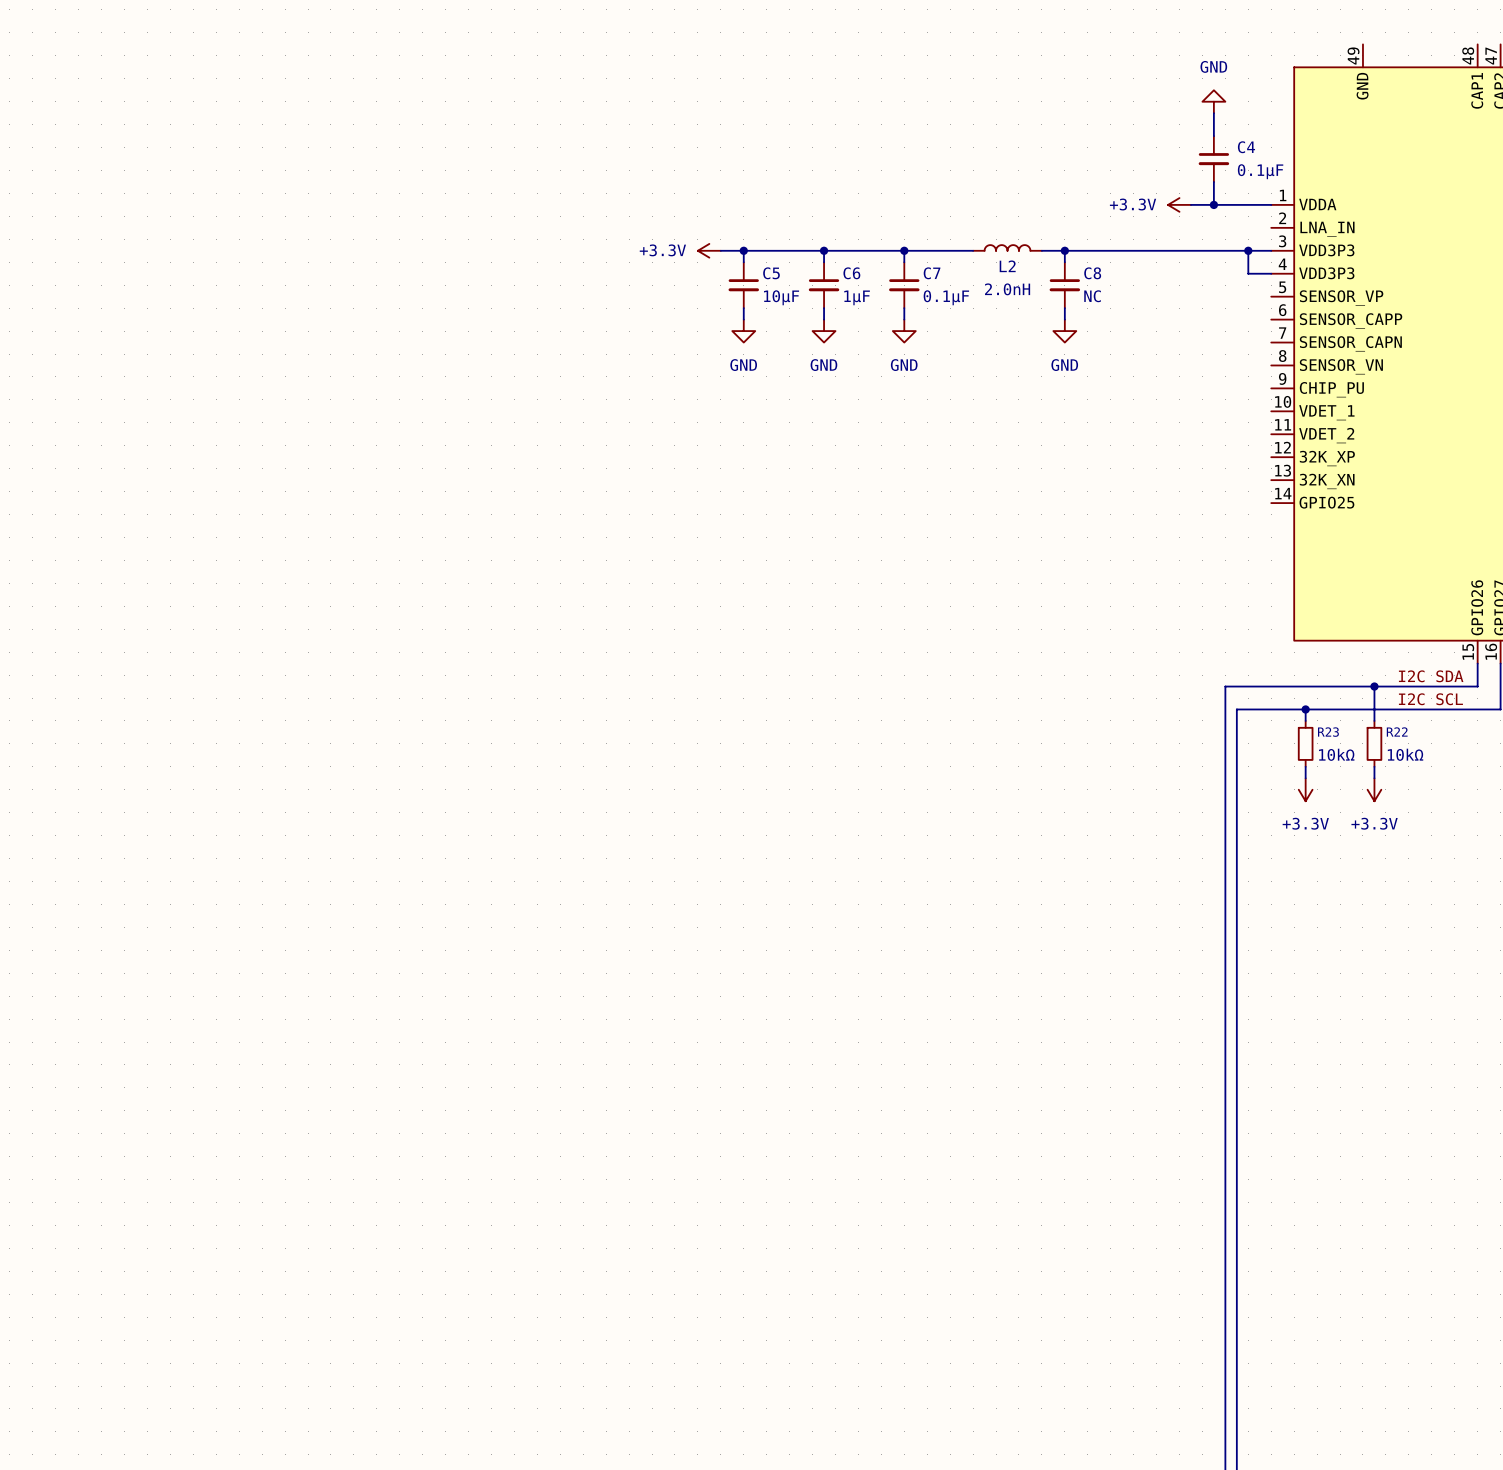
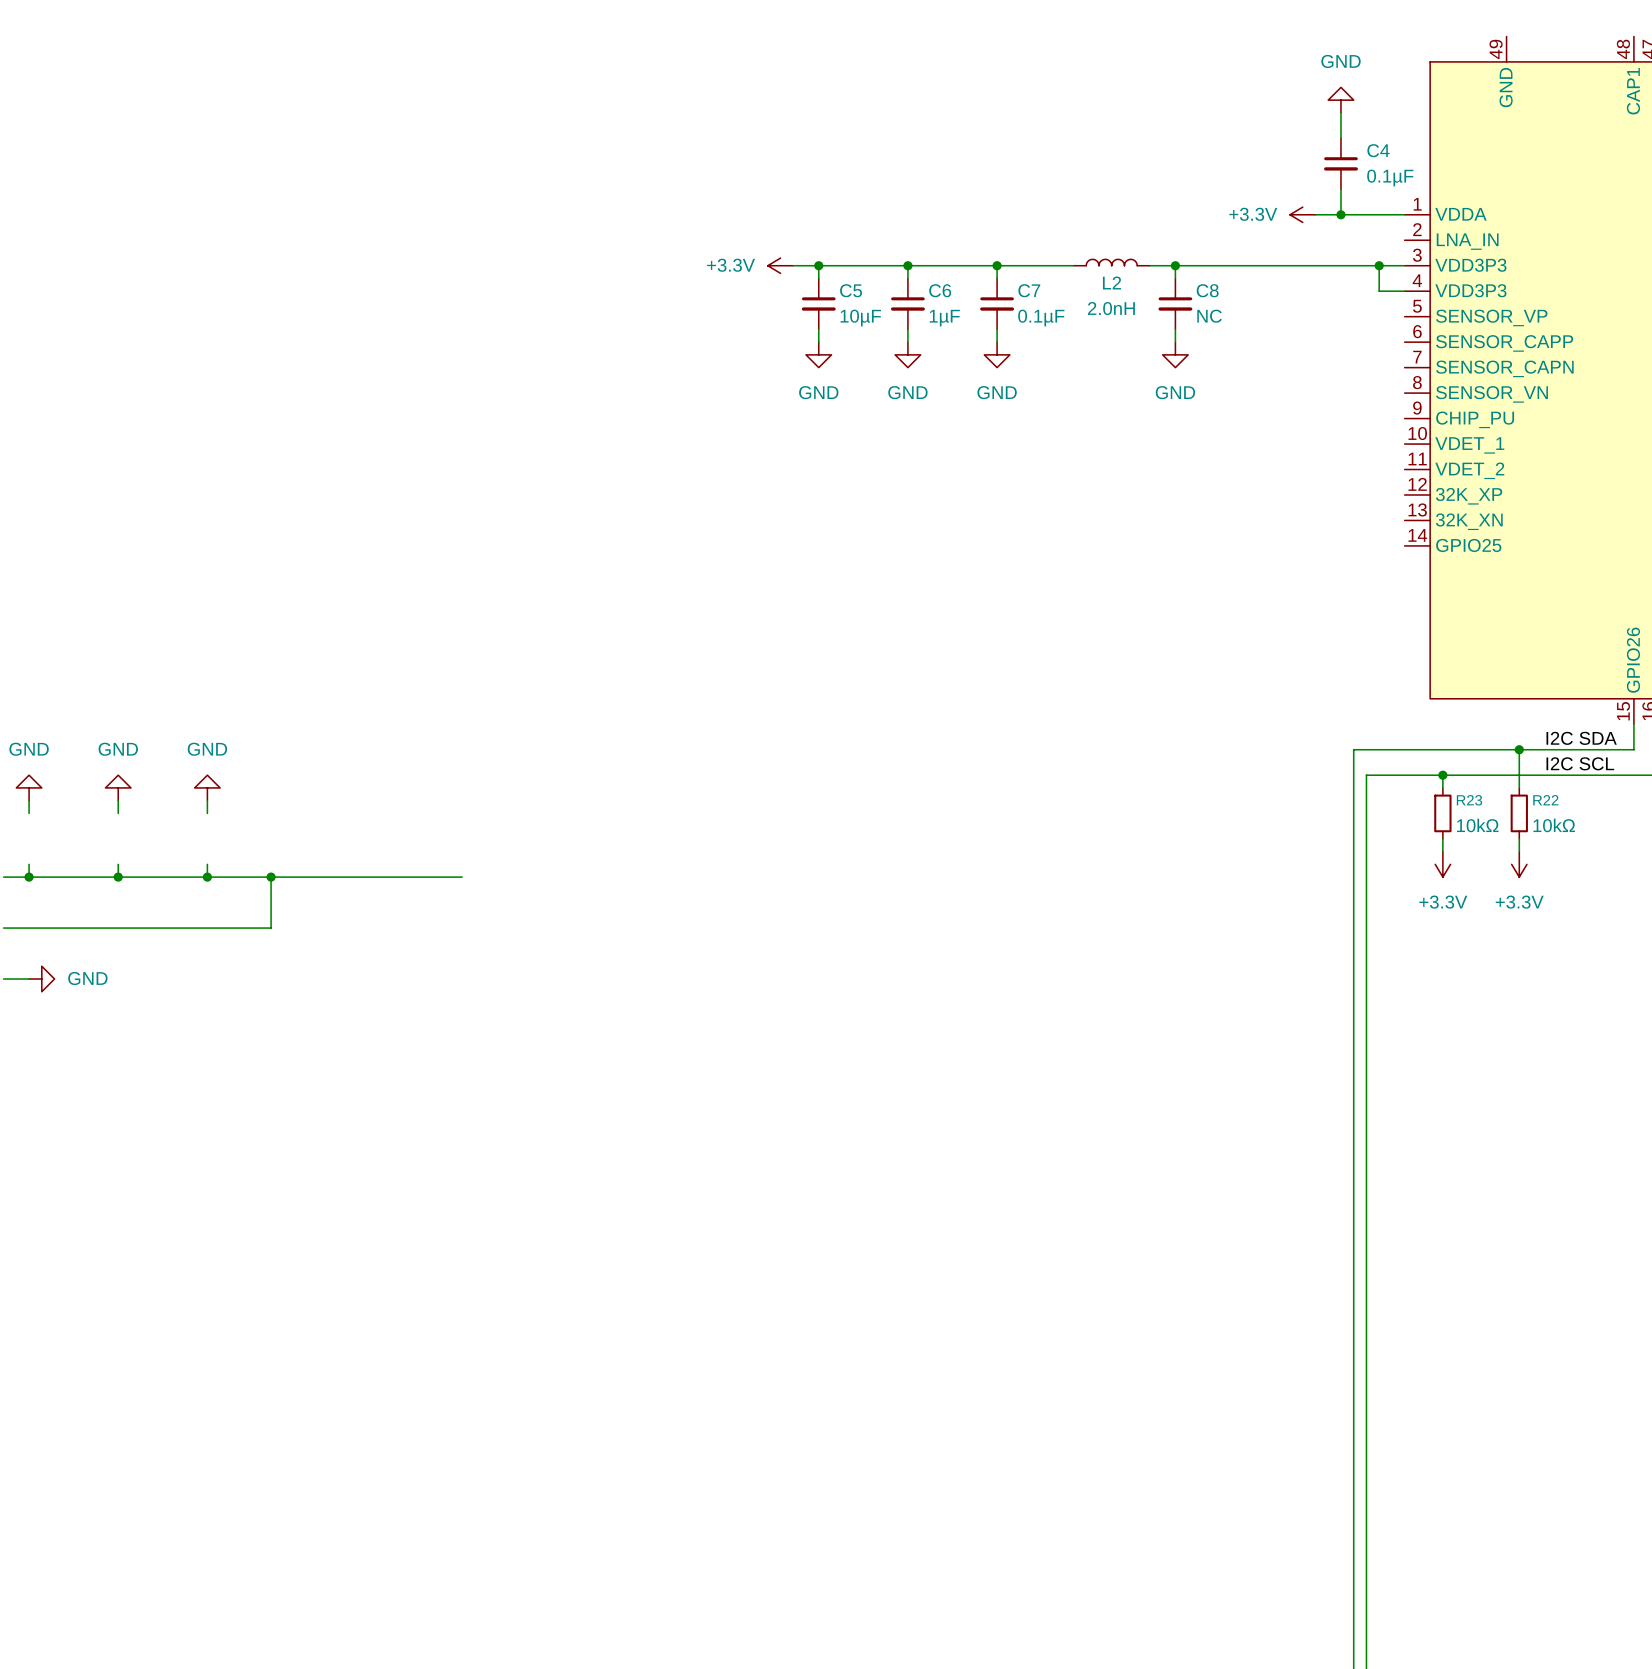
power symbol: none -> GND (29, 787)
power symbol: none -> GND (118, 787)
power symbol: none -> GND (207, 787)
wire: none -> (29, 800) (29, 813)
wire: none -> (118, 800) (118, 813)
wire: none -> (207, 800) (207, 813)
wire: none -> (29, 864) (29, 877)
wire: none -> (118, 864) (118, 877)
wire: none -> (207, 864) (207, 877)
wire: none -> (3, 877) (462, 877)
junction: none -> (29, 877)
junction: none -> (118, 877)
junction: none -> (207, 877)
wire: none -> (271, 877) (271, 928) (3, 928)
junction: none -> (271, 877)
wire: none -> (3, 979) (29, 979)
power symbol: none -> GND (41, 979)

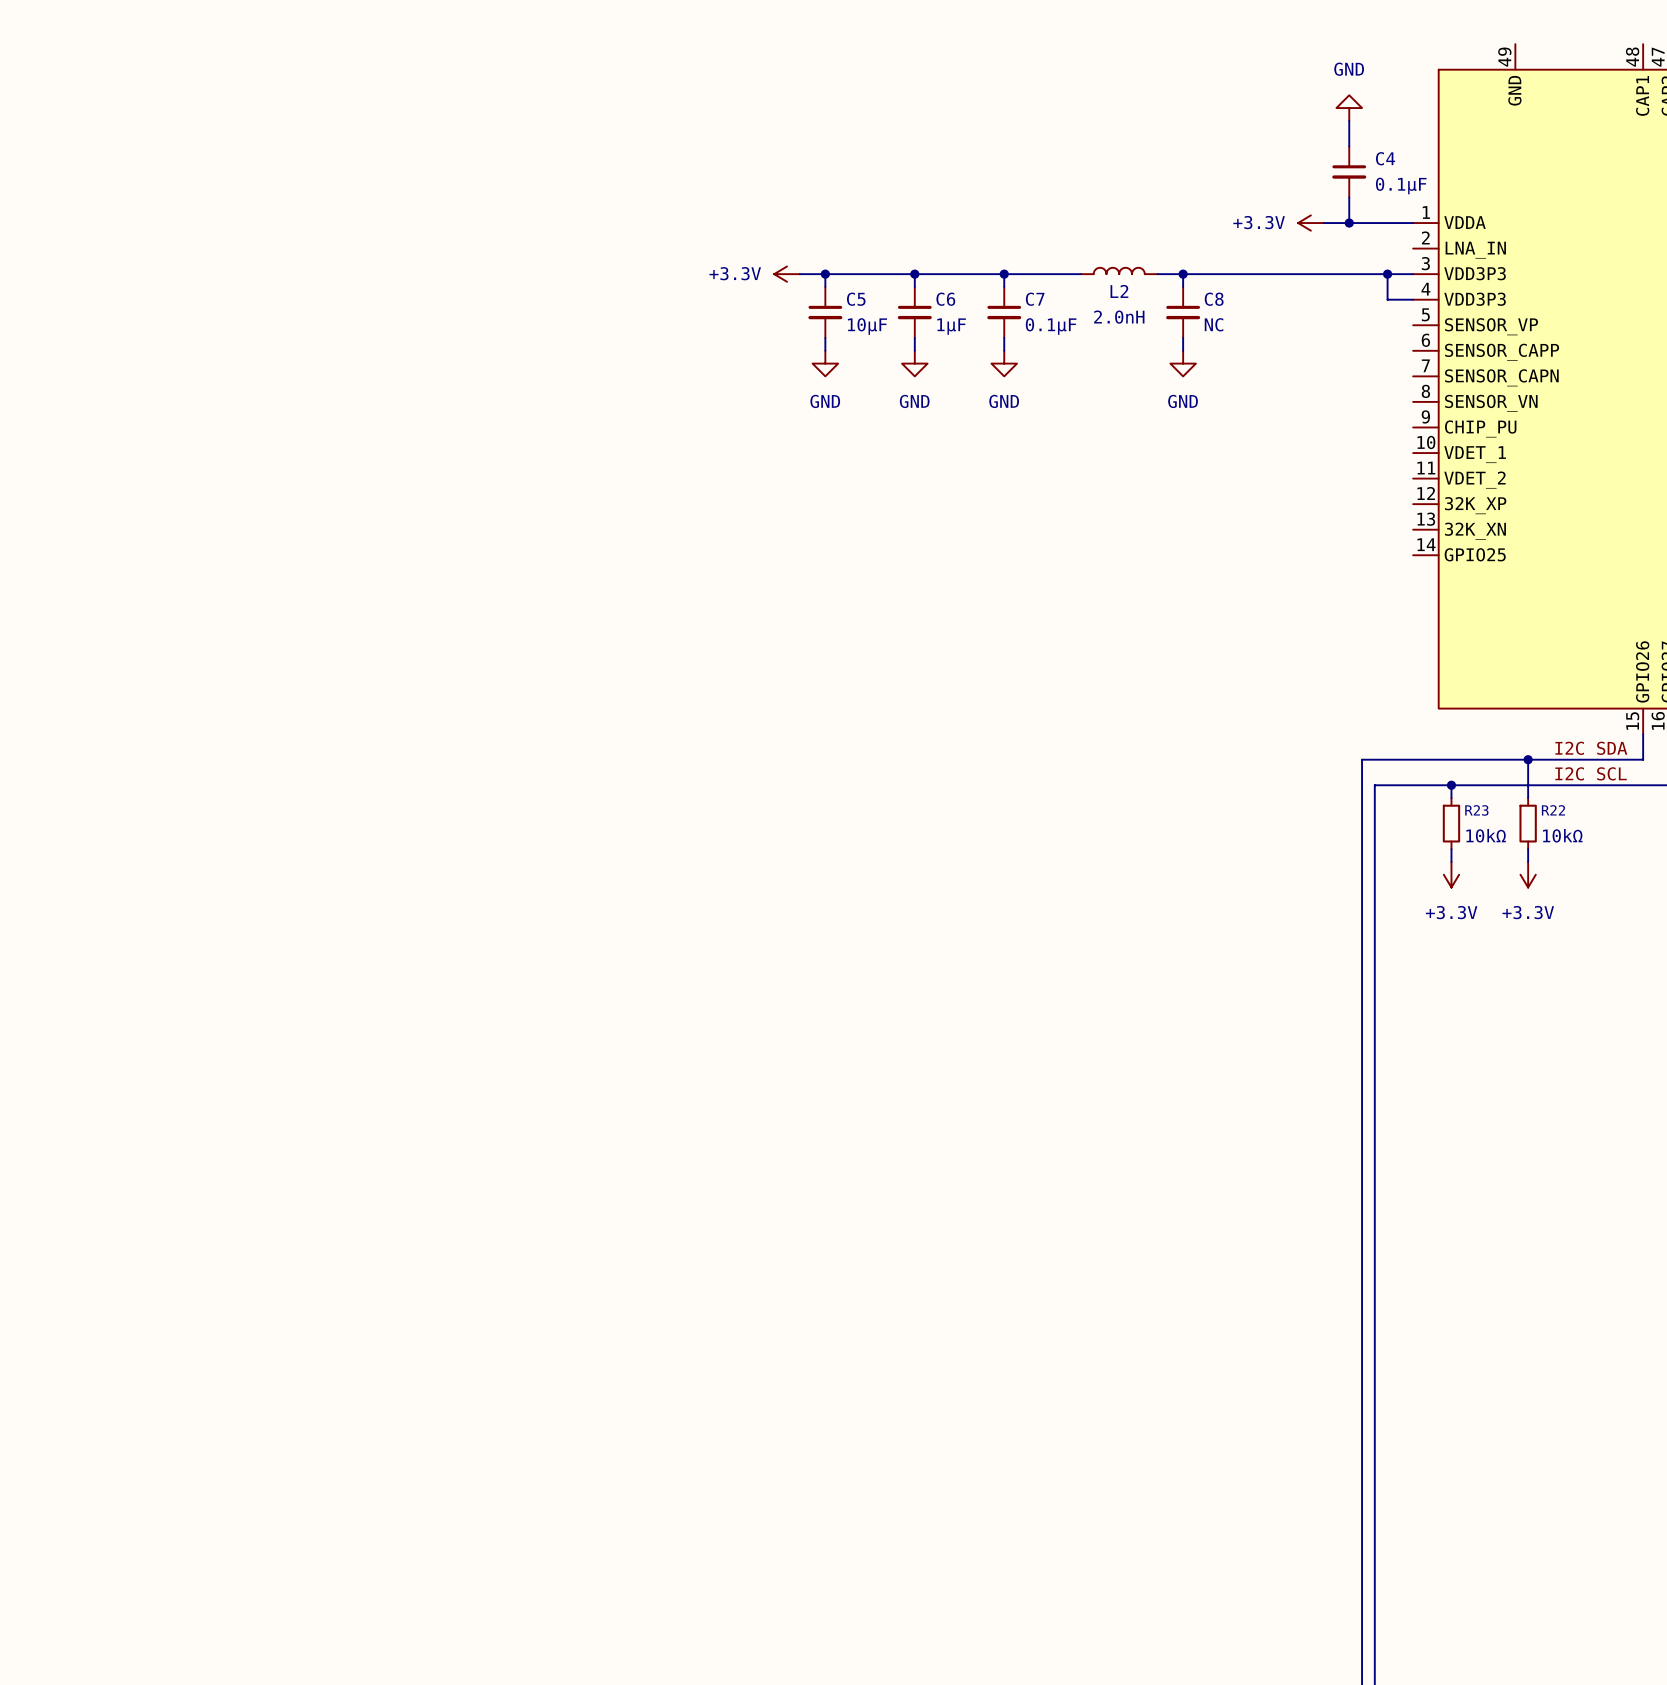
power symbol: GND (29, 787) -> none
power symbol: GND (118, 787) -> none
power symbol: GND (207, 787) -> none
wire: (29, 800) (29, 813) -> none
wire: (118, 800) (118, 813) -> none
wire: (207, 800) (207, 813) -> none
wire: (29, 864) (29, 877) -> none
wire: (118, 864) (118, 877) -> none
wire: (207, 864) (207, 877) -> none
wire: (3, 877) (462, 877) -> none
junction: (29, 877) -> none
junction: (118, 877) -> none
junction: (207, 877) -> none
wire: (271, 877) (271, 928) (3, 928) -> none
junction: (271, 877) -> none
wire: (3, 979) (29, 979) -> none
power symbol: GND (41, 979) -> none

